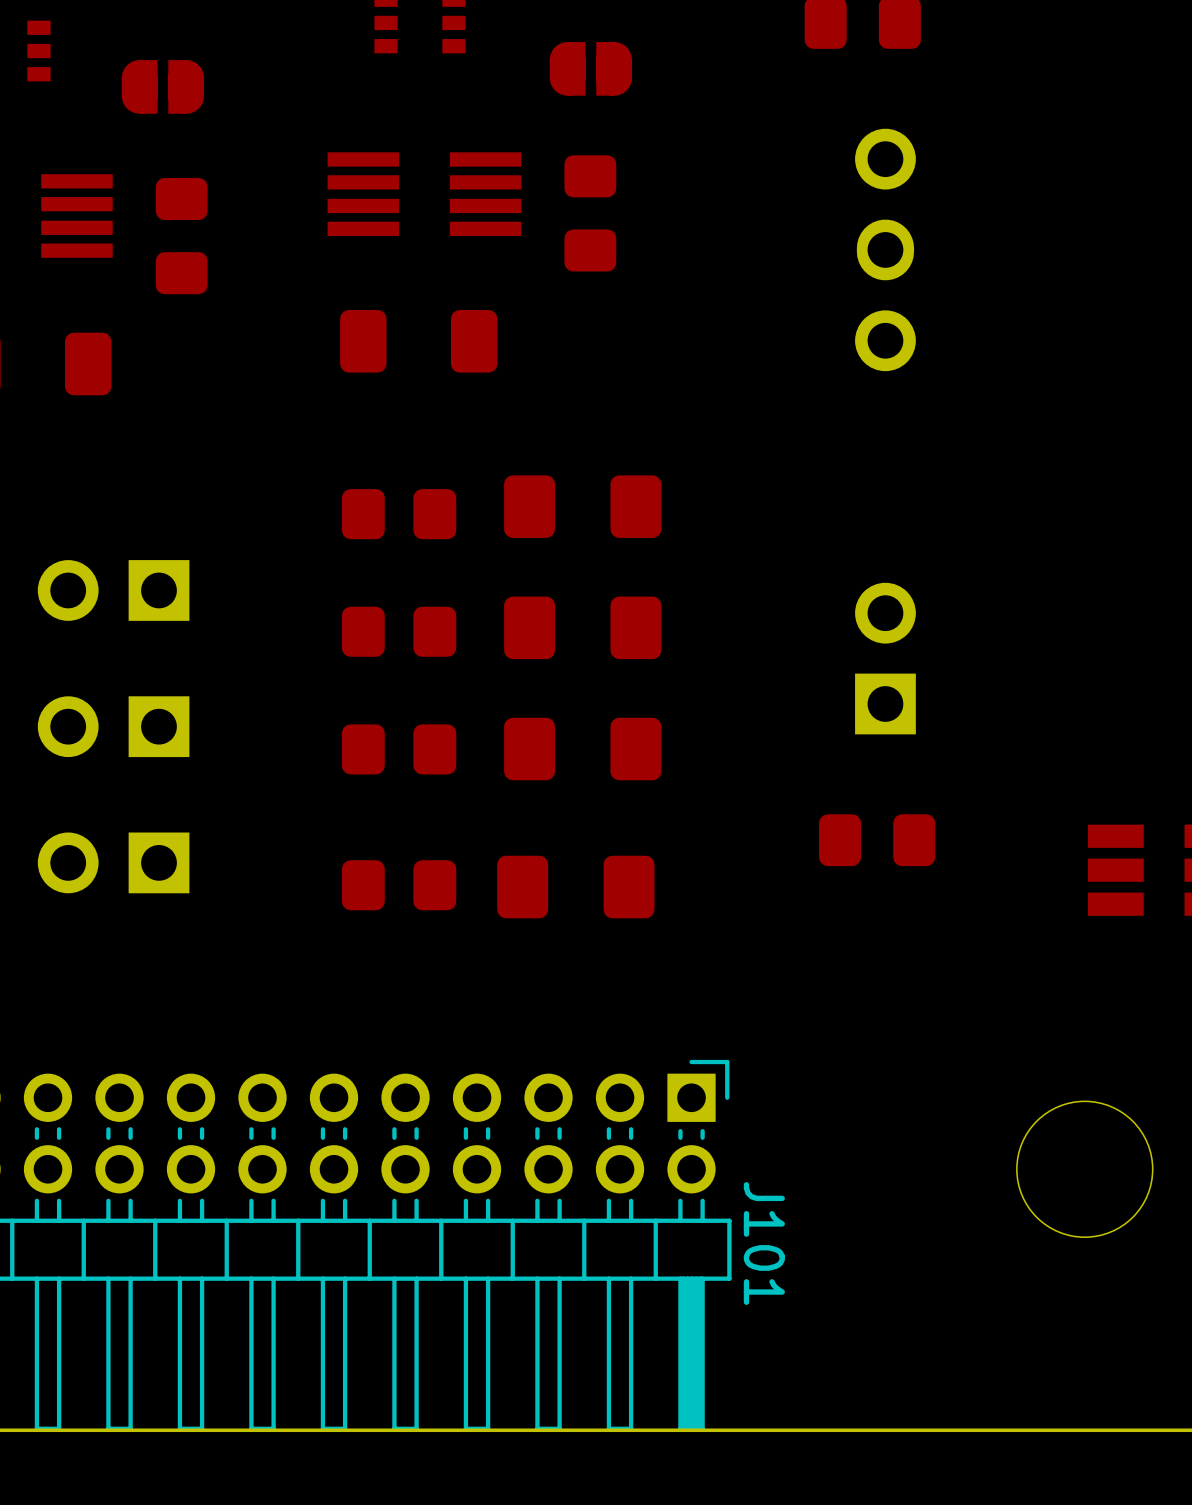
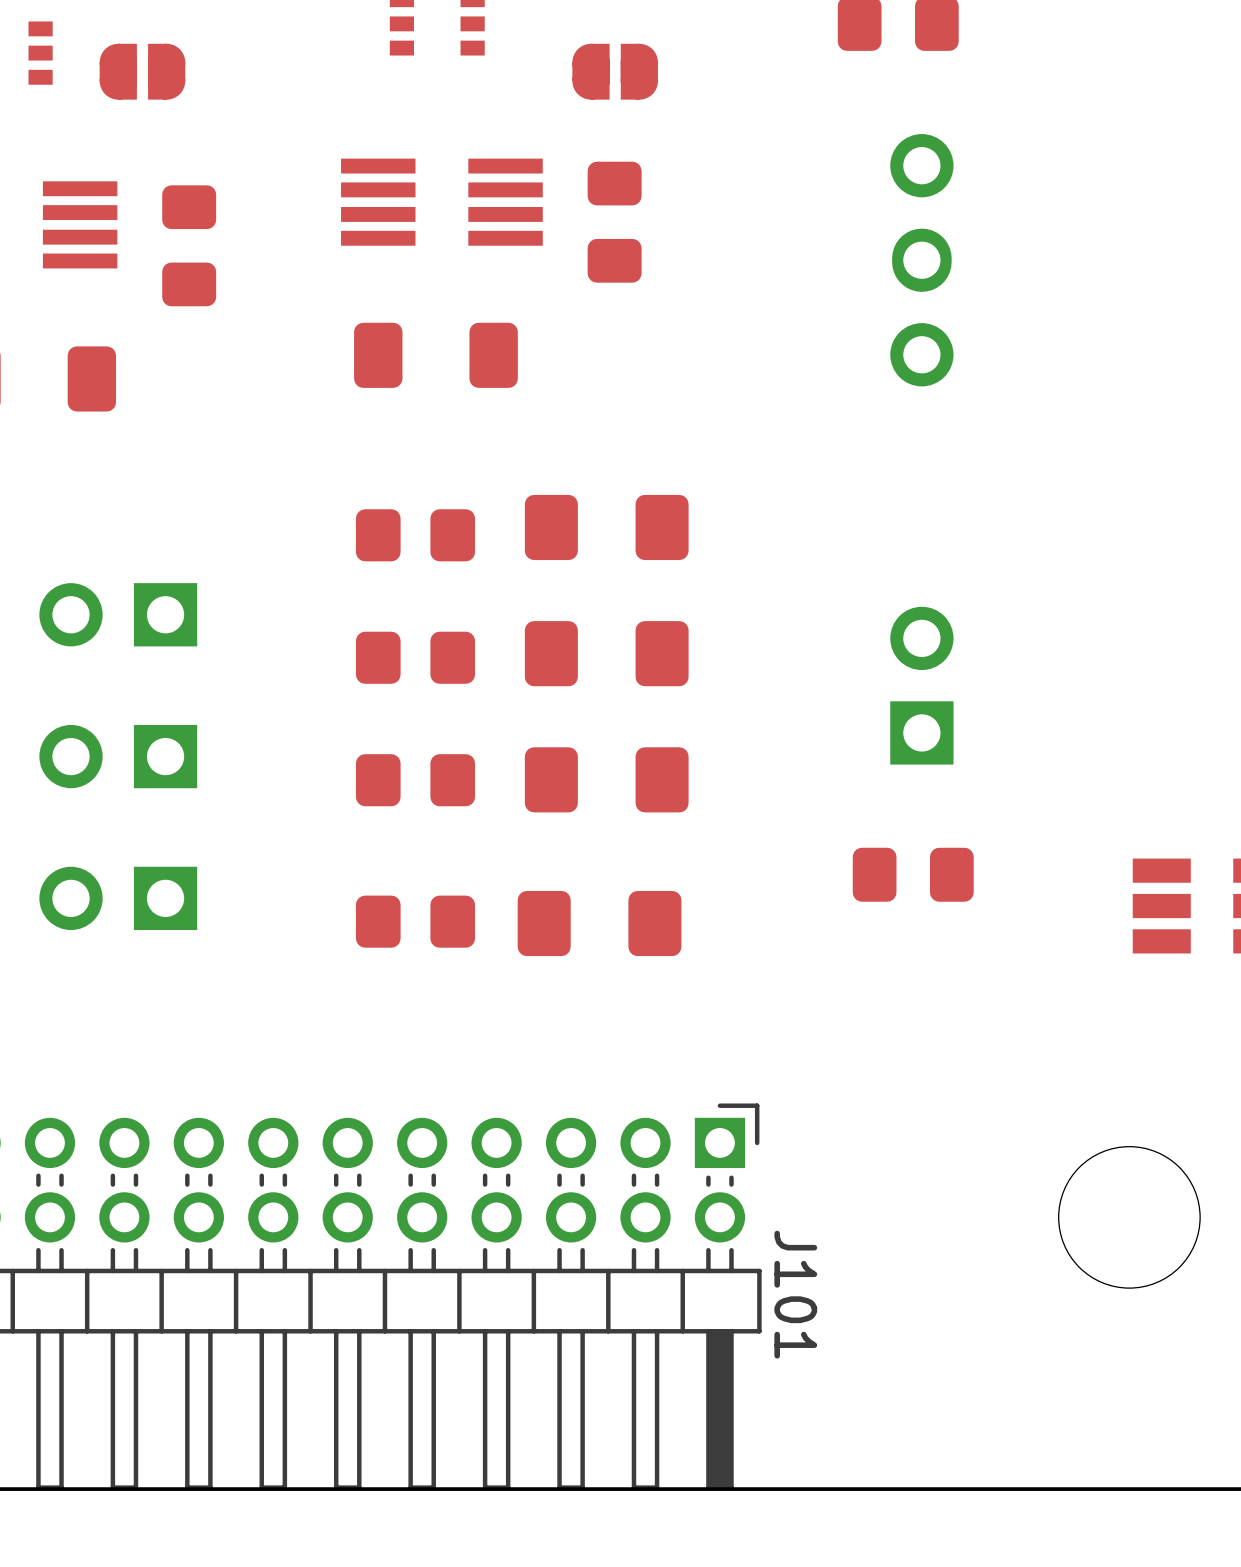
part position: (162, 86) -> (142, 71)

